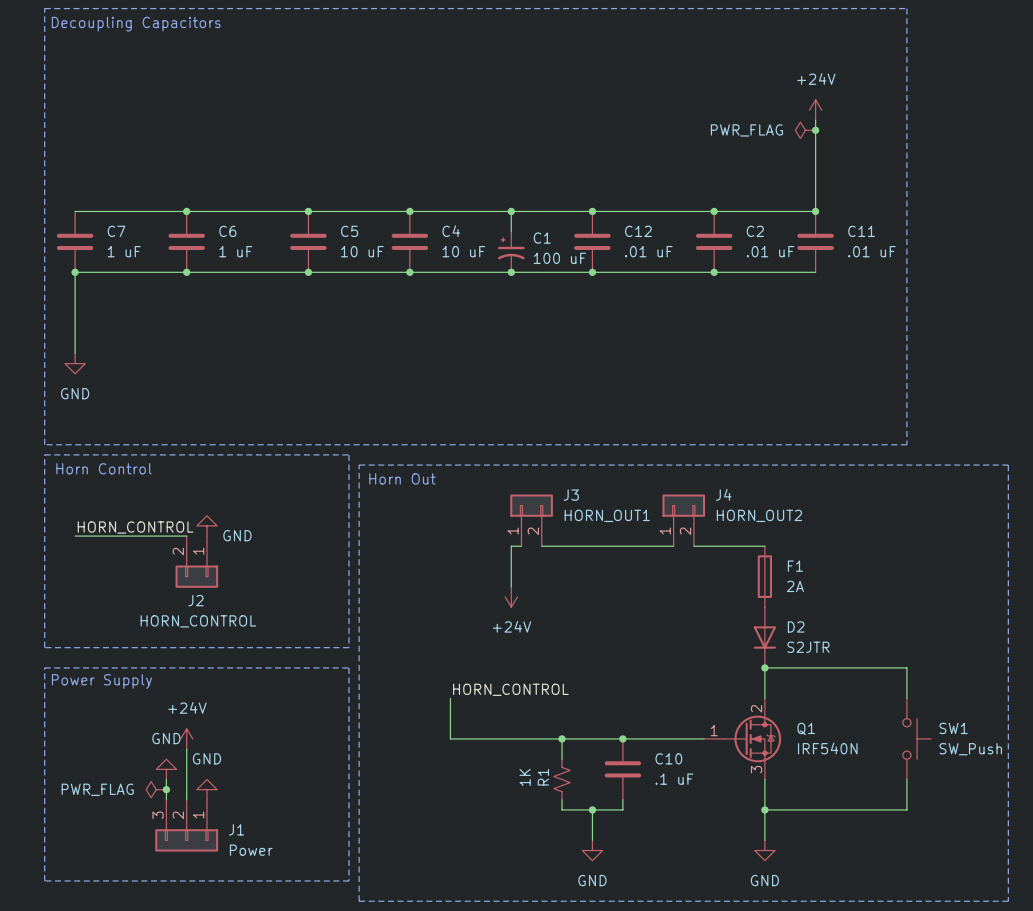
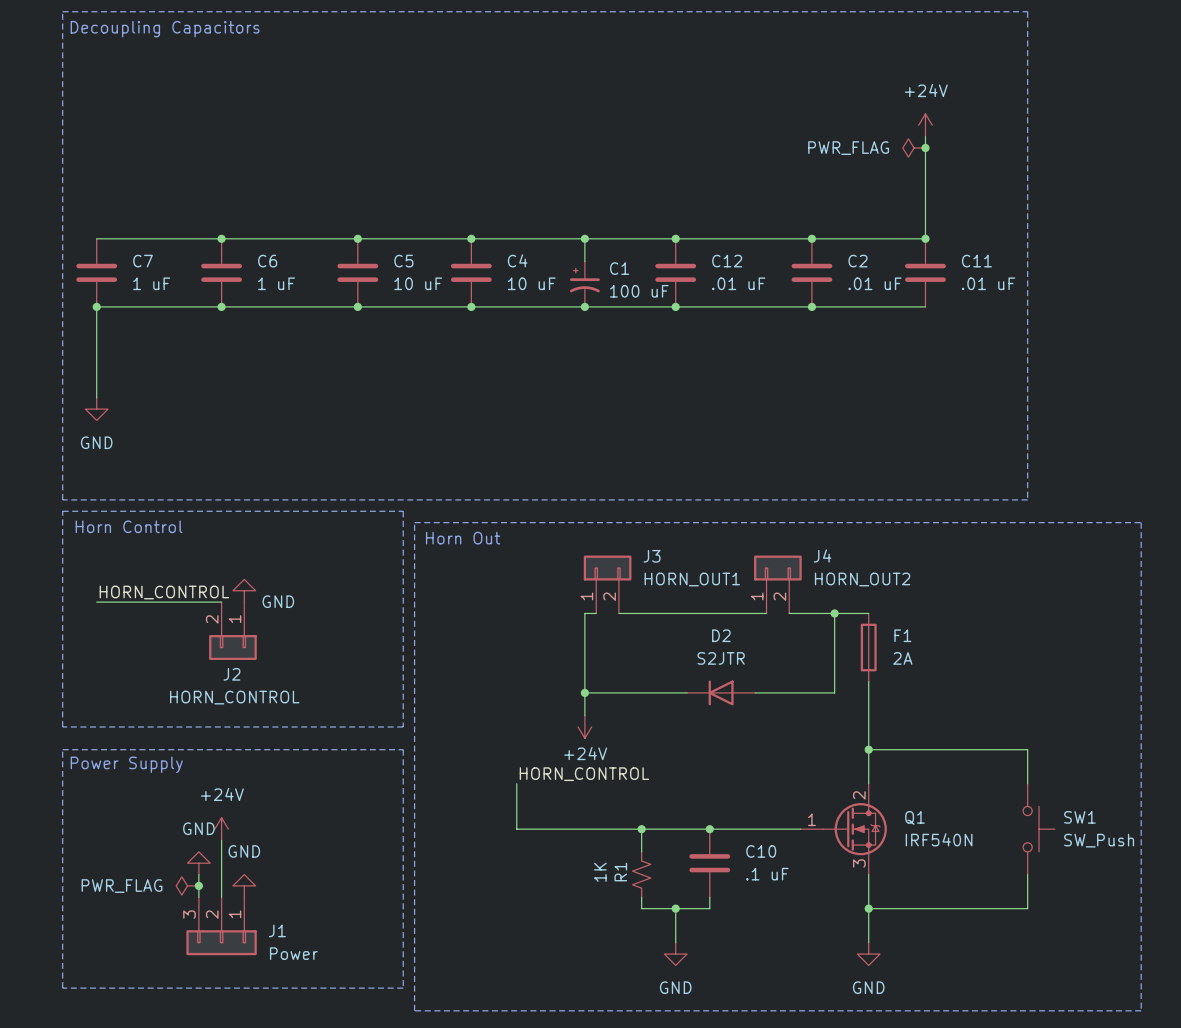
wire: none -> (834, 613) (834, 692) (755, 692)
junction: none -> (834, 613)
wire: none -> (584, 658) (584, 715)
power symbol position: +24V (511, 596) -> +24V (584, 726)
wire: none -> (584, 692) (687, 692)
junction: none -> (584, 692)
power symbol text position: +24V (512, 626) -> +24V (585, 753)
D2 name position: D2 (796, 626) -> D2 (721, 635)
D2 rotation: 0° (764, 637) -> 90° clockwise (721, 692)
D2 position: (764, 637) -> (721, 692)
D2 value position: S2JTR (808, 647) -> S2JTR (721, 658)

